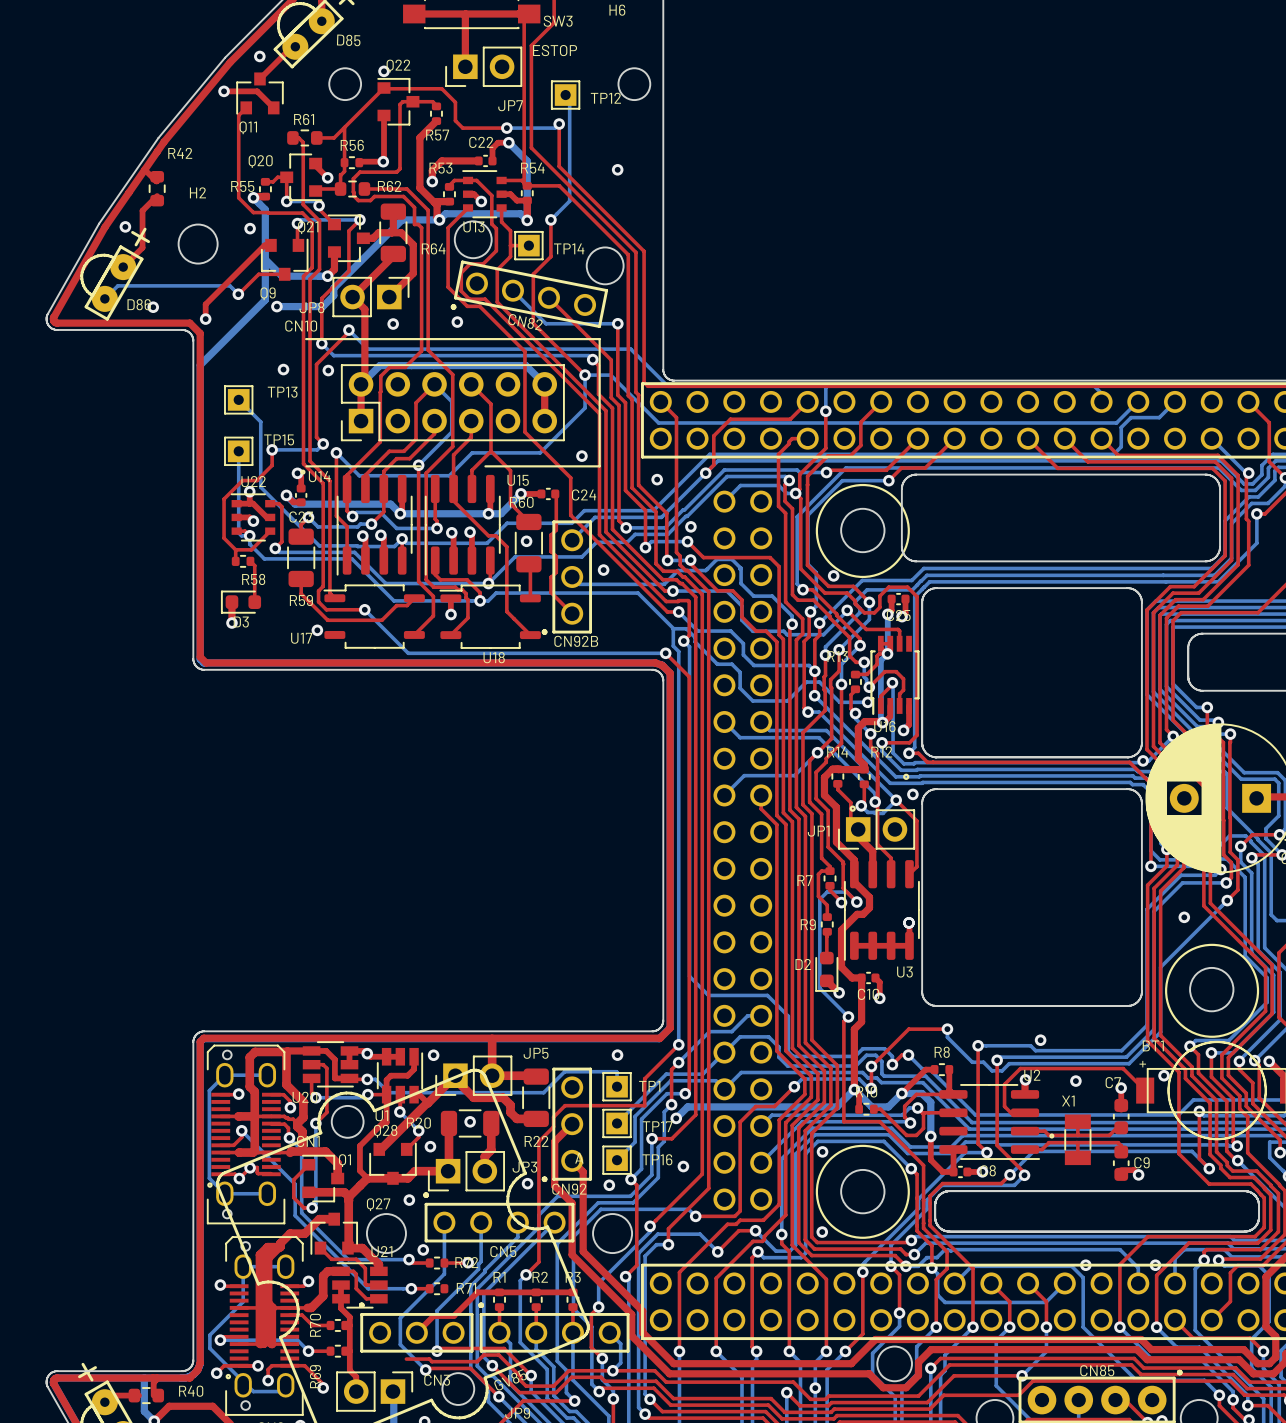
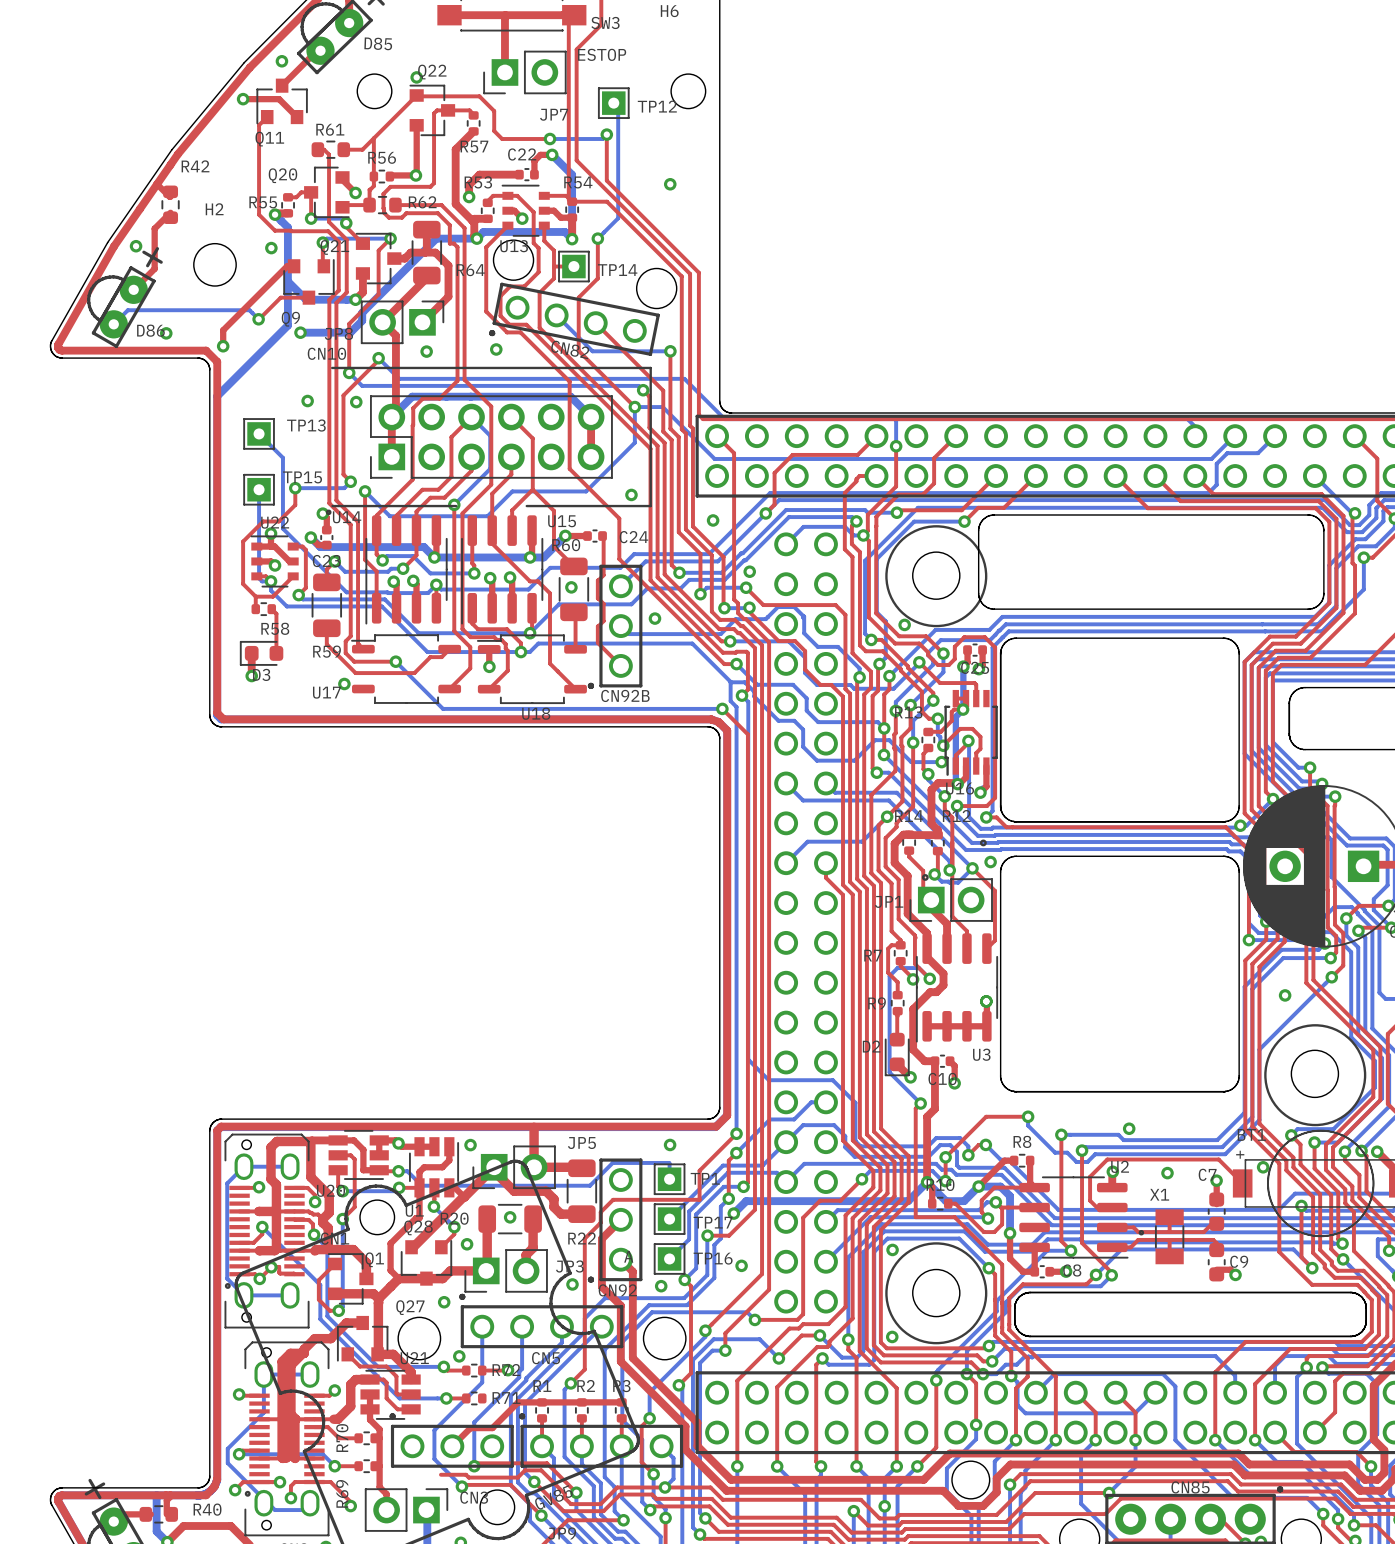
via: (1085, 1265) -> none
via: (1155, 1265) -> none

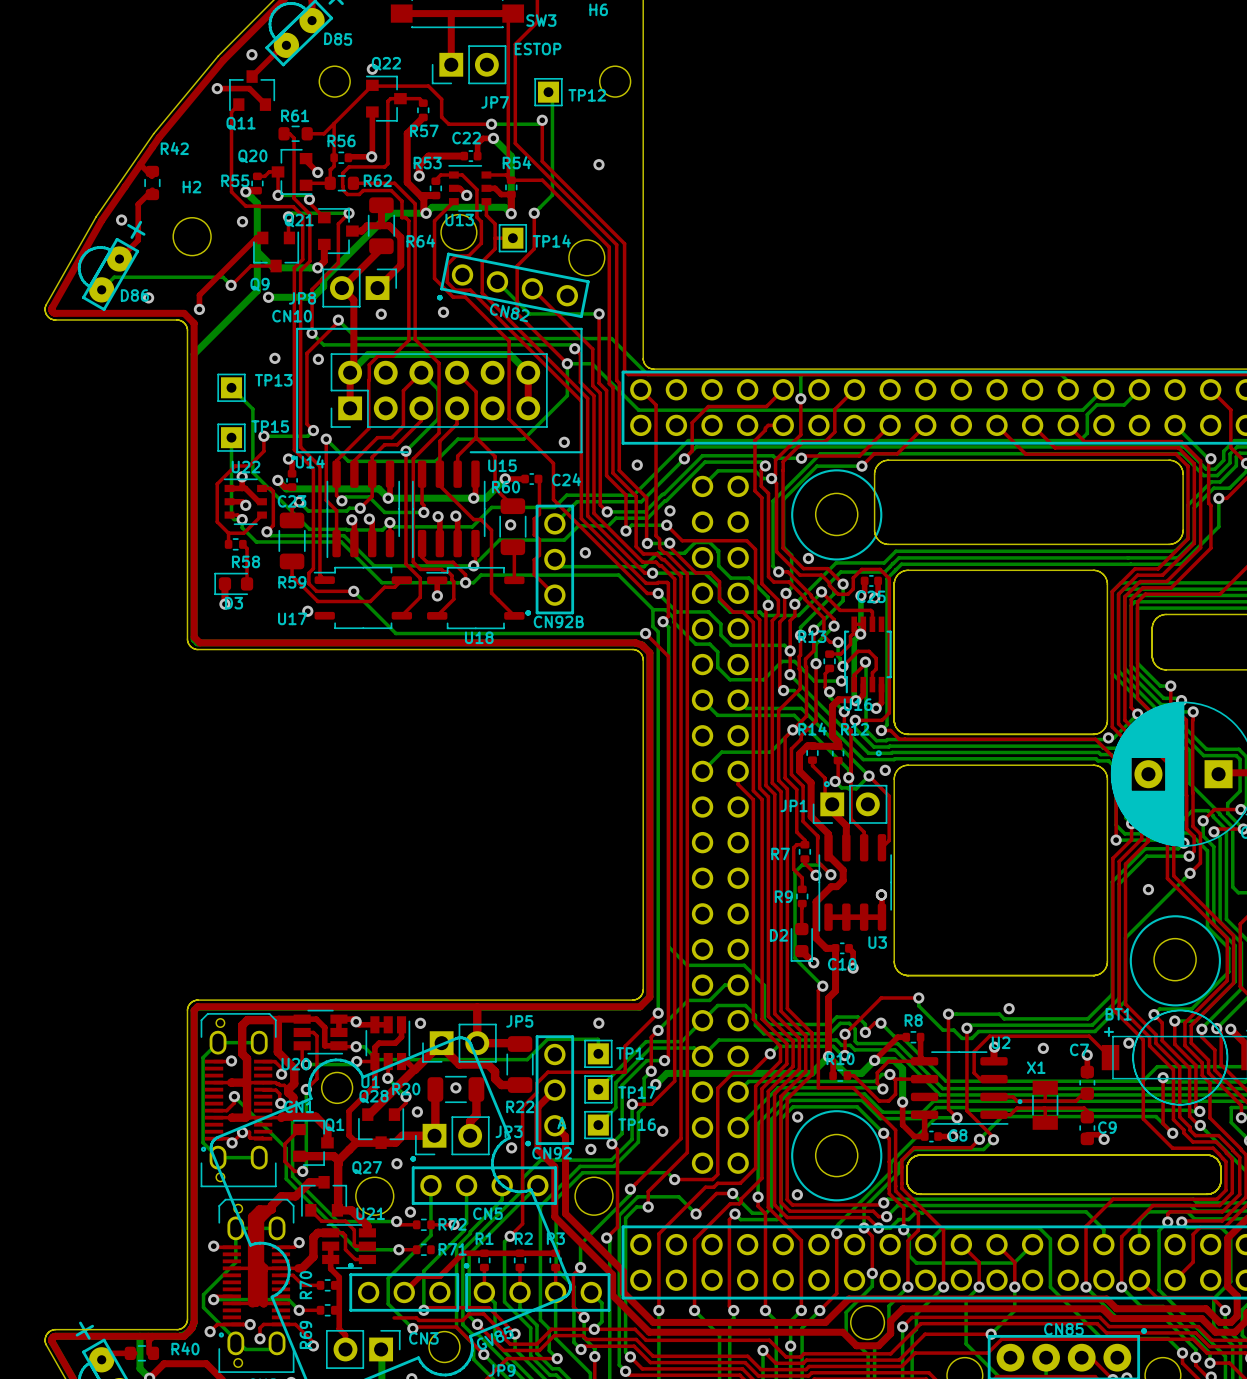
CN10 footprint: [325, 366, 652, 516] -> [291, 327, 583, 461]

